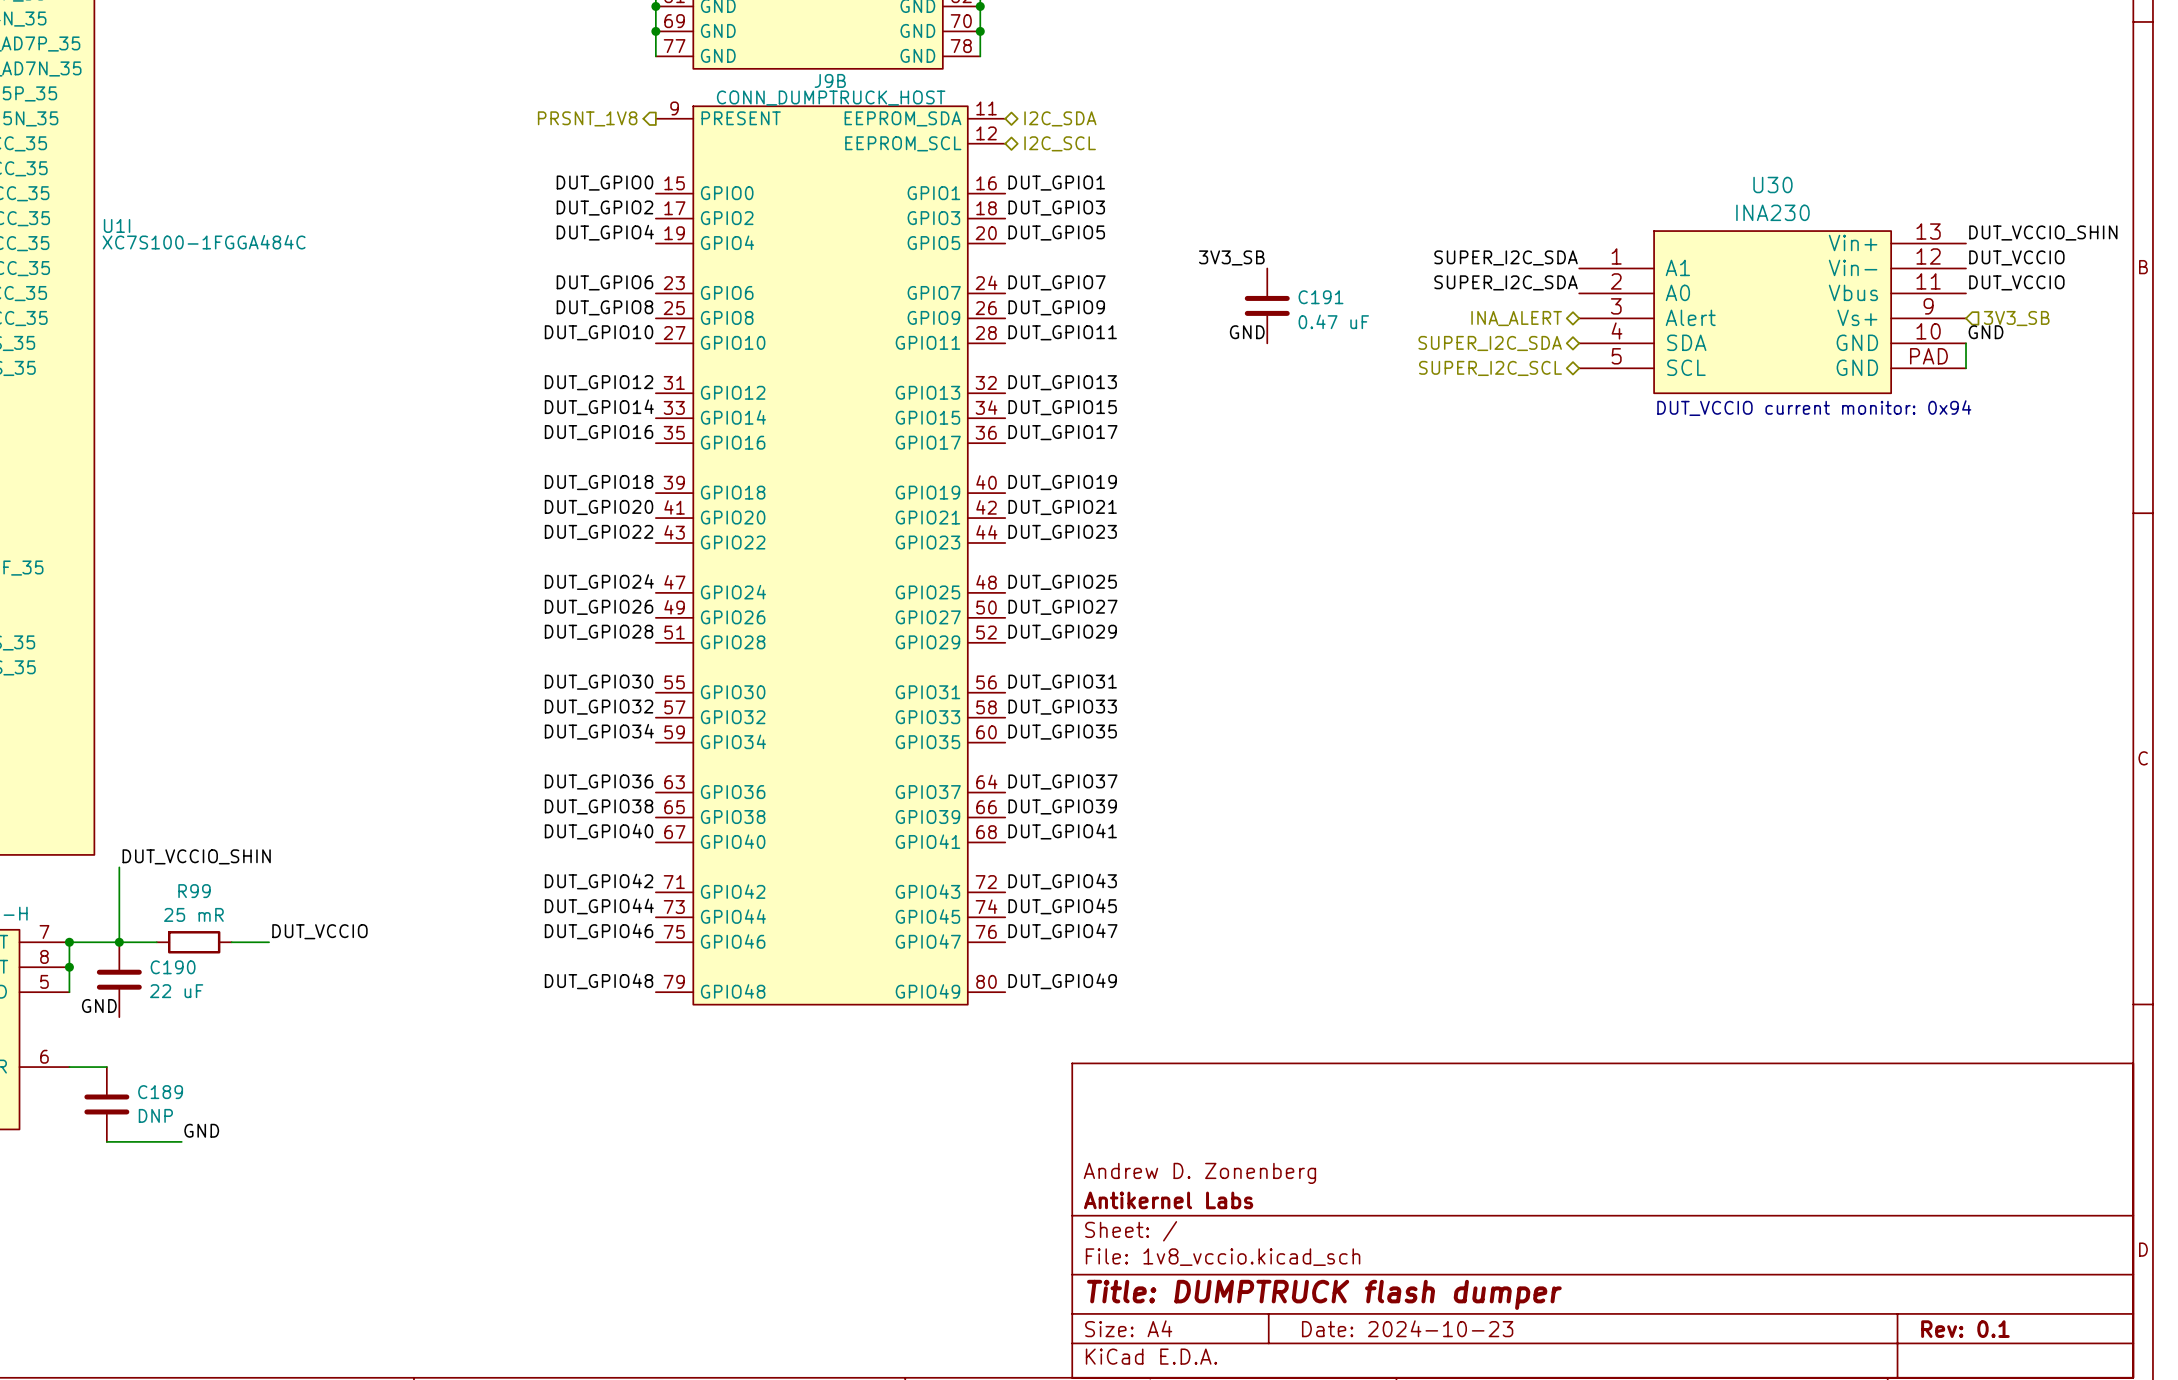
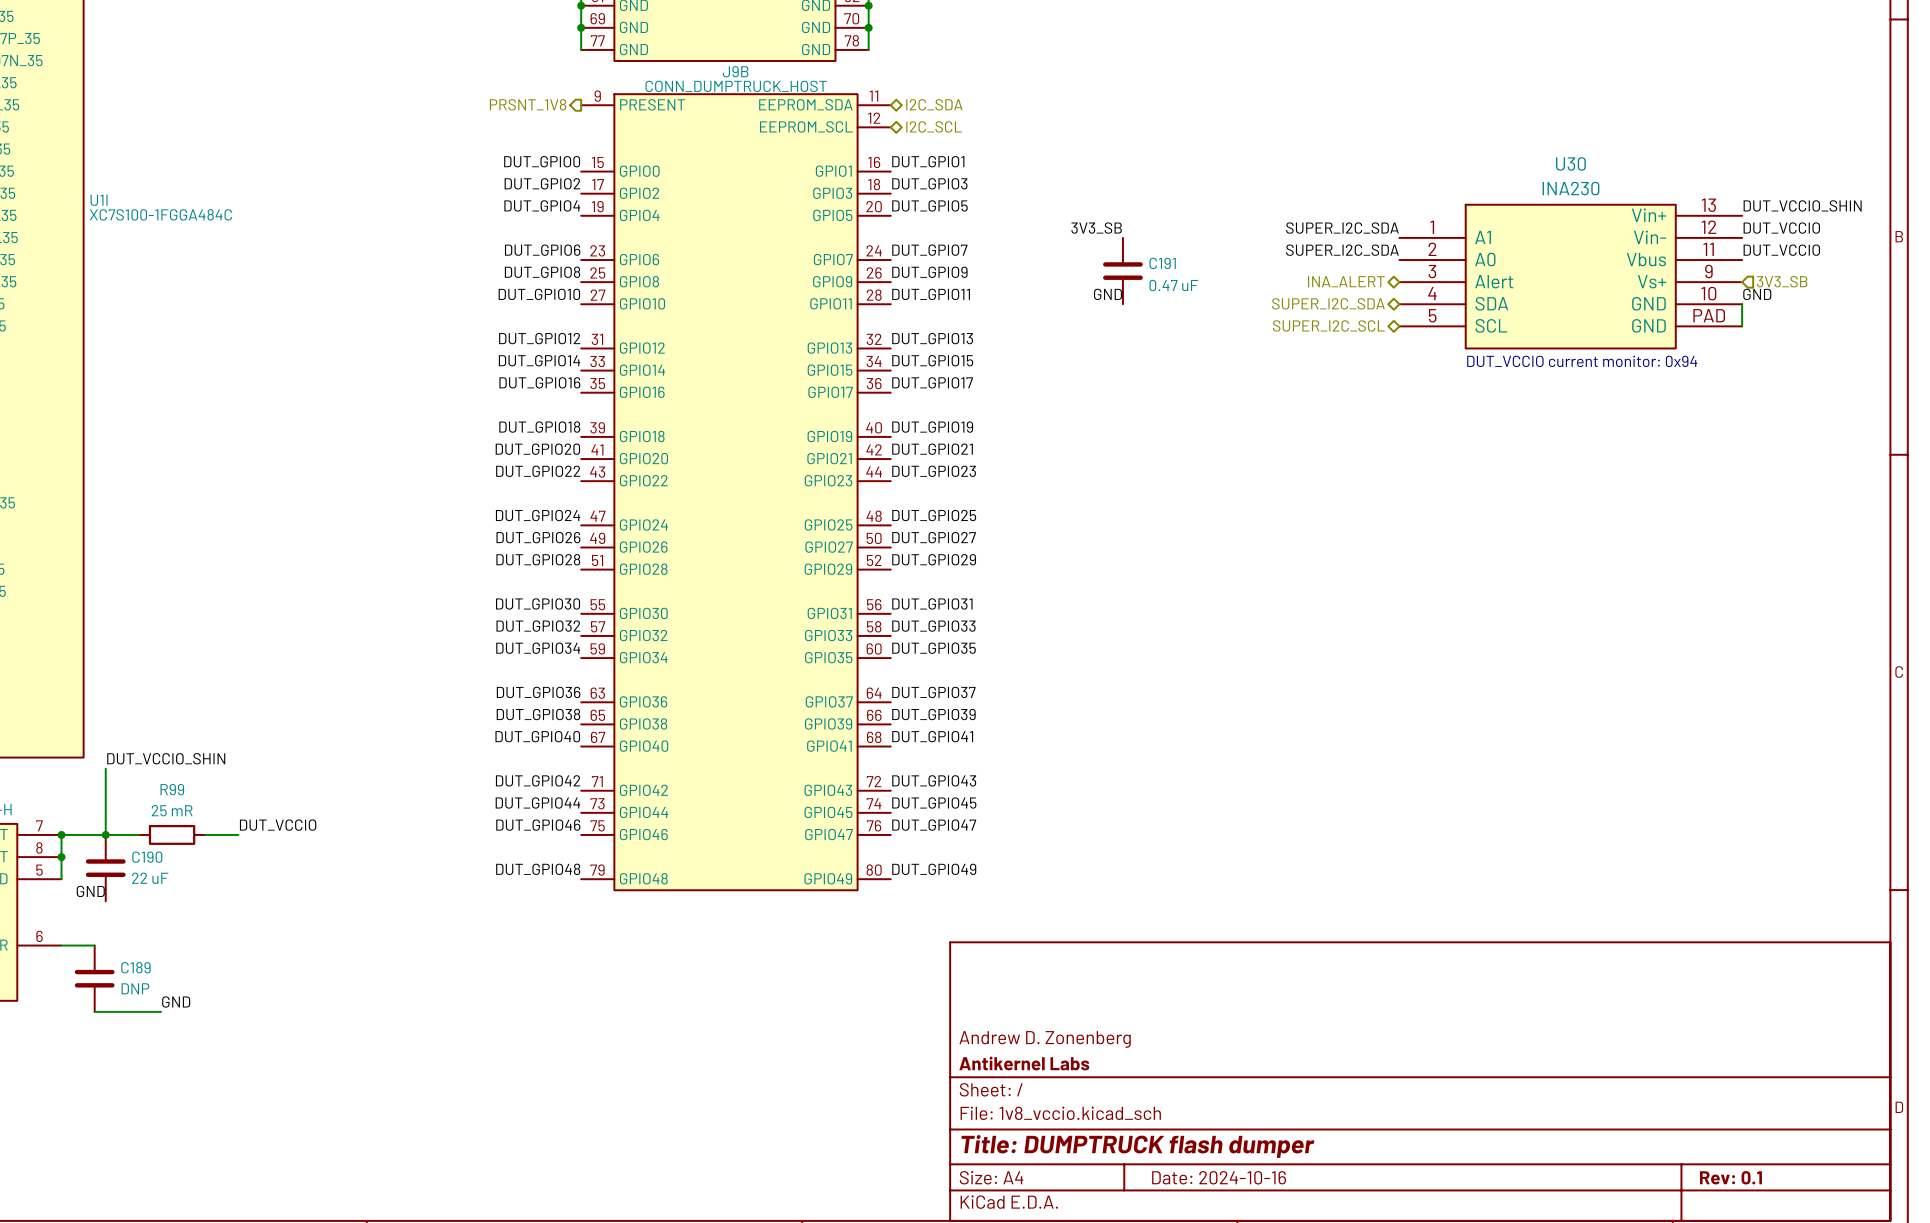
title block: Date: 2024-10-23 (1407, 1328) -> Date: 2024-10-16 (1219, 1177)

